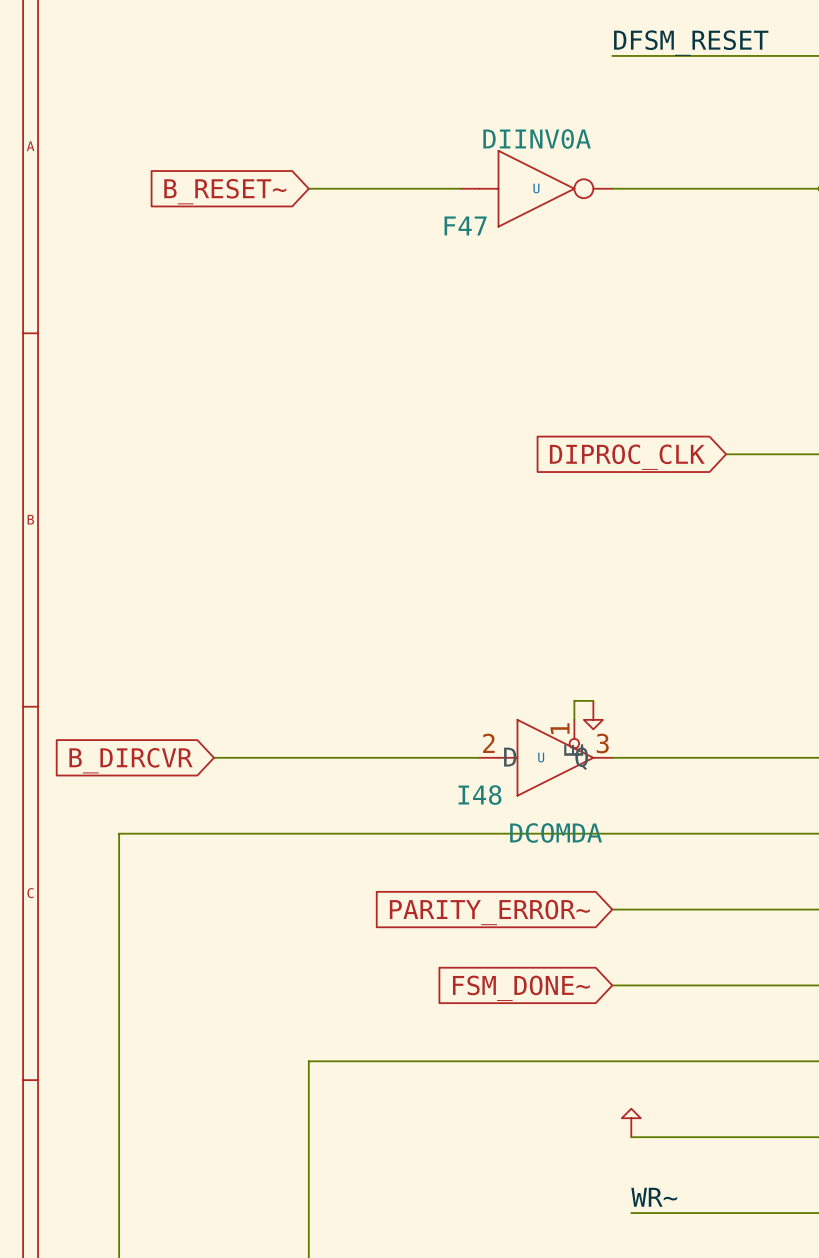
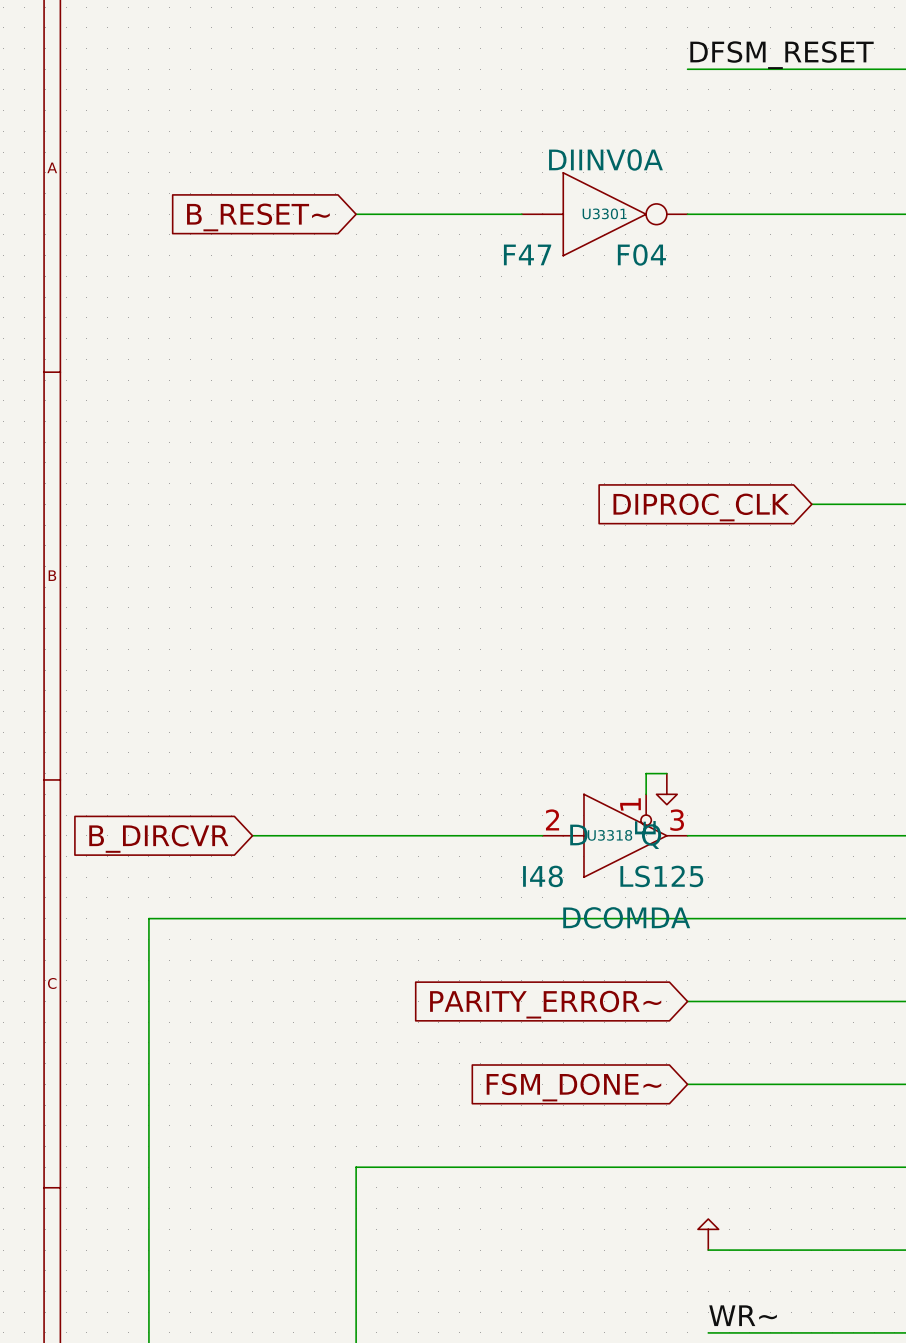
U name: U (536, 188) -> U3301 (604, 213)
U value: none -> F04 (641, 254)
U name: U (541, 757) -> U3318 (610, 835)
U value: none -> LS125 (661, 876)

